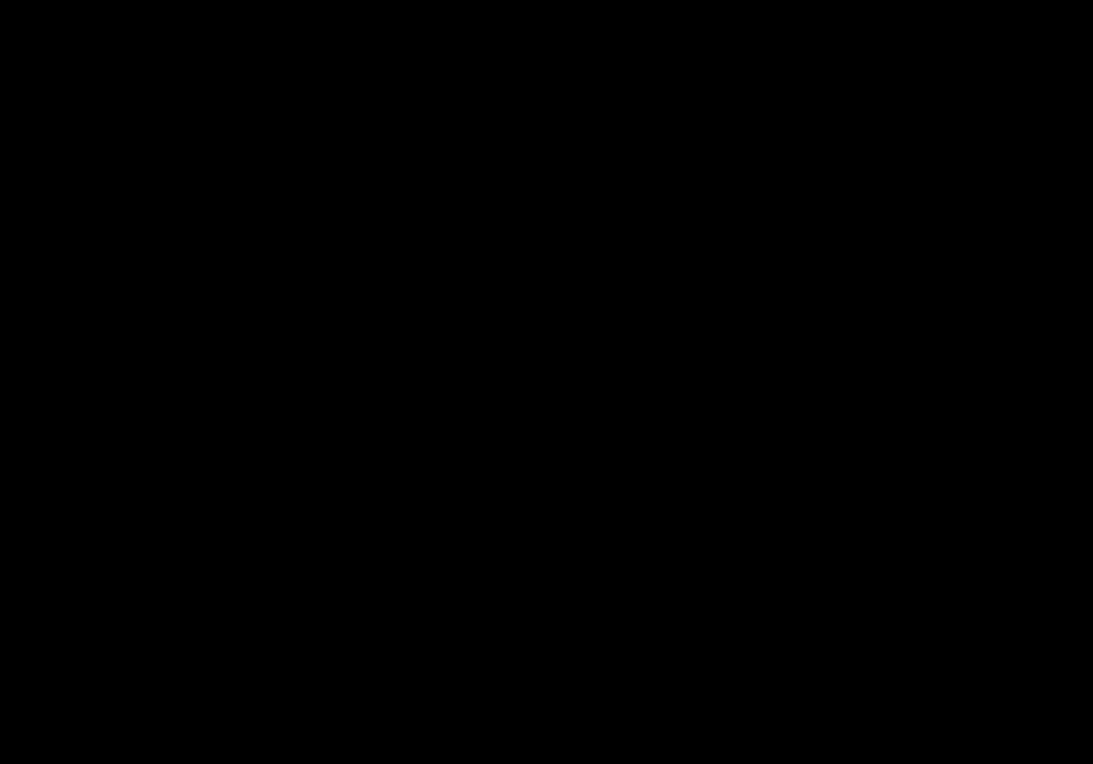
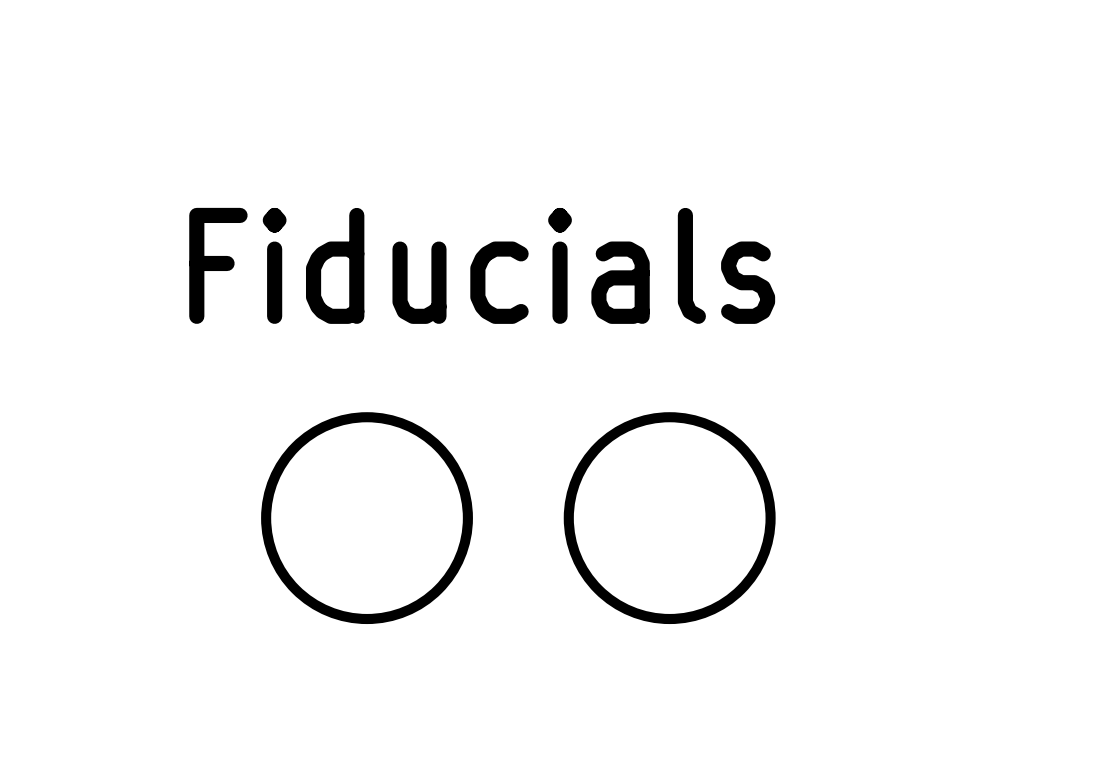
text: none -> Fiducials (482, 265)
part: none -> (367, 518)
part: none -> (669, 518)

